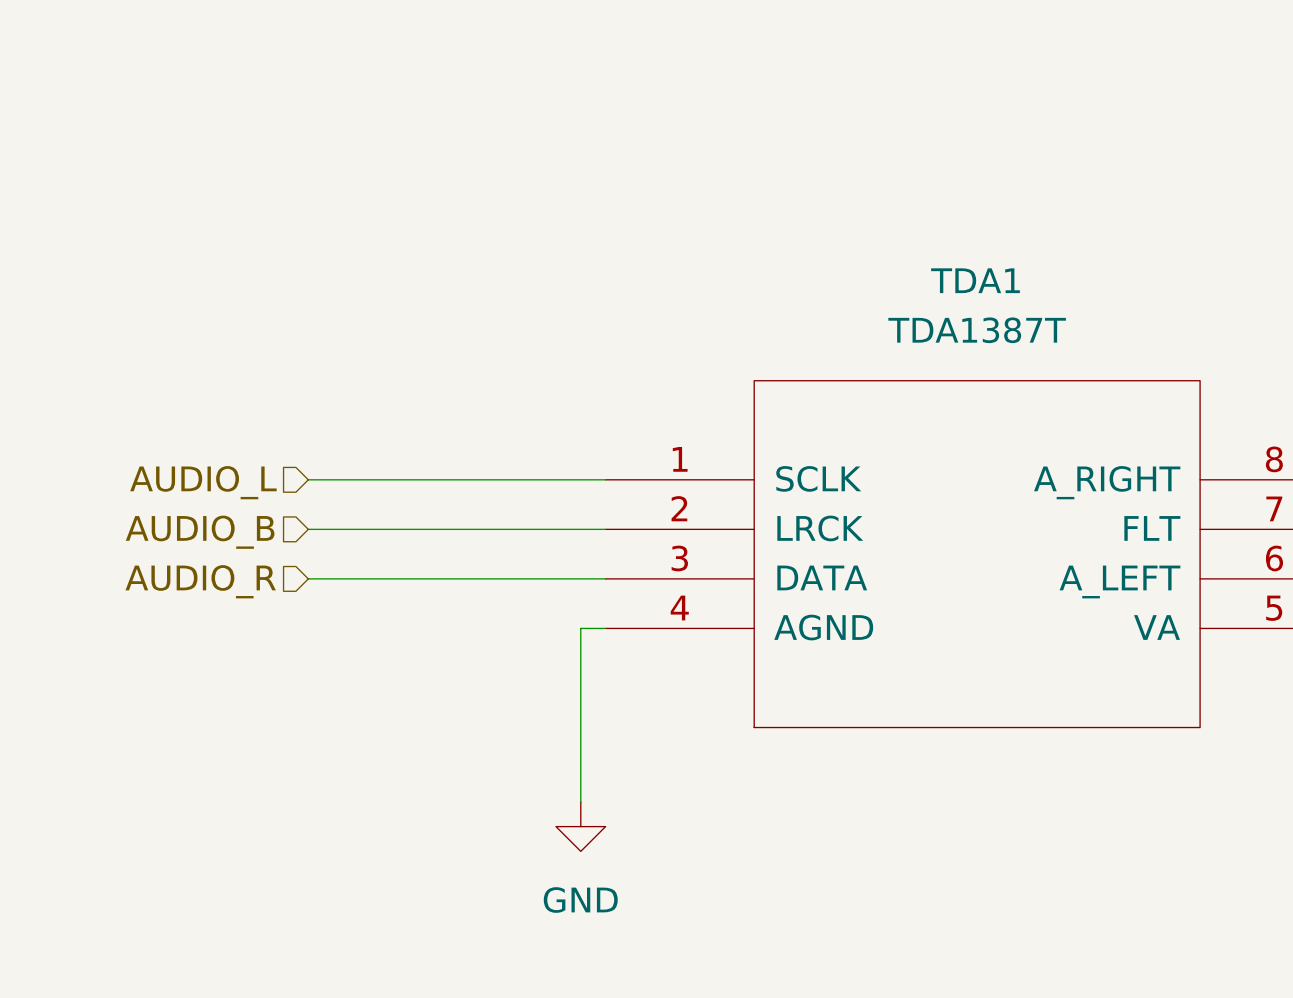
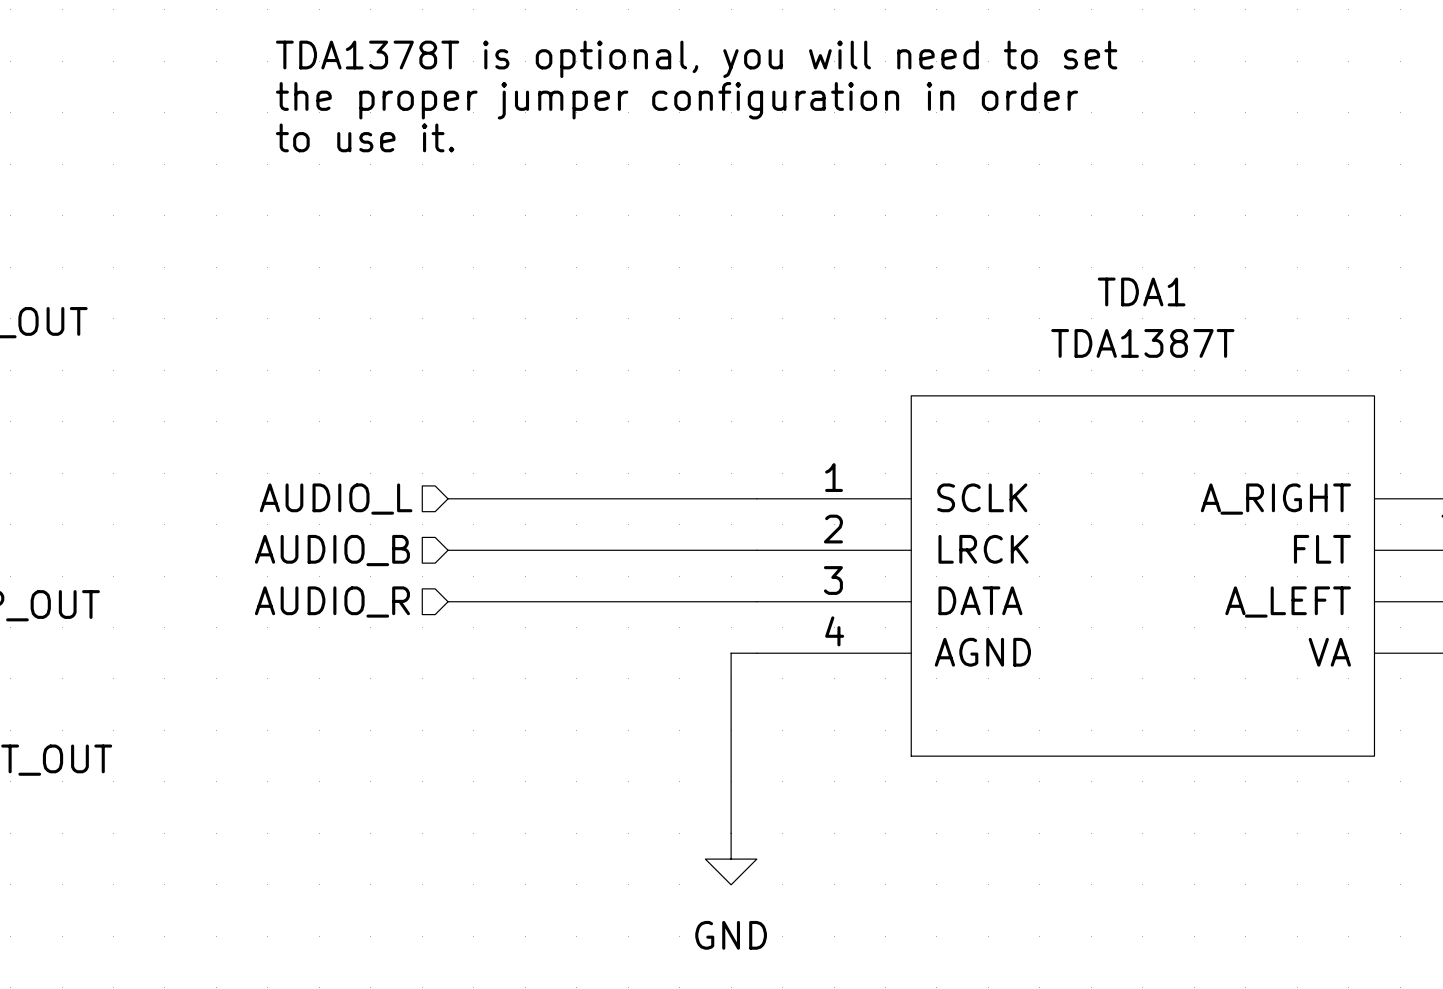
text: none -> TDA1378T is optional, you will need to set (696, 59)
text: none -> the proper jumper configuration in order (677, 100)
text: none -> to use it. (365, 137)

